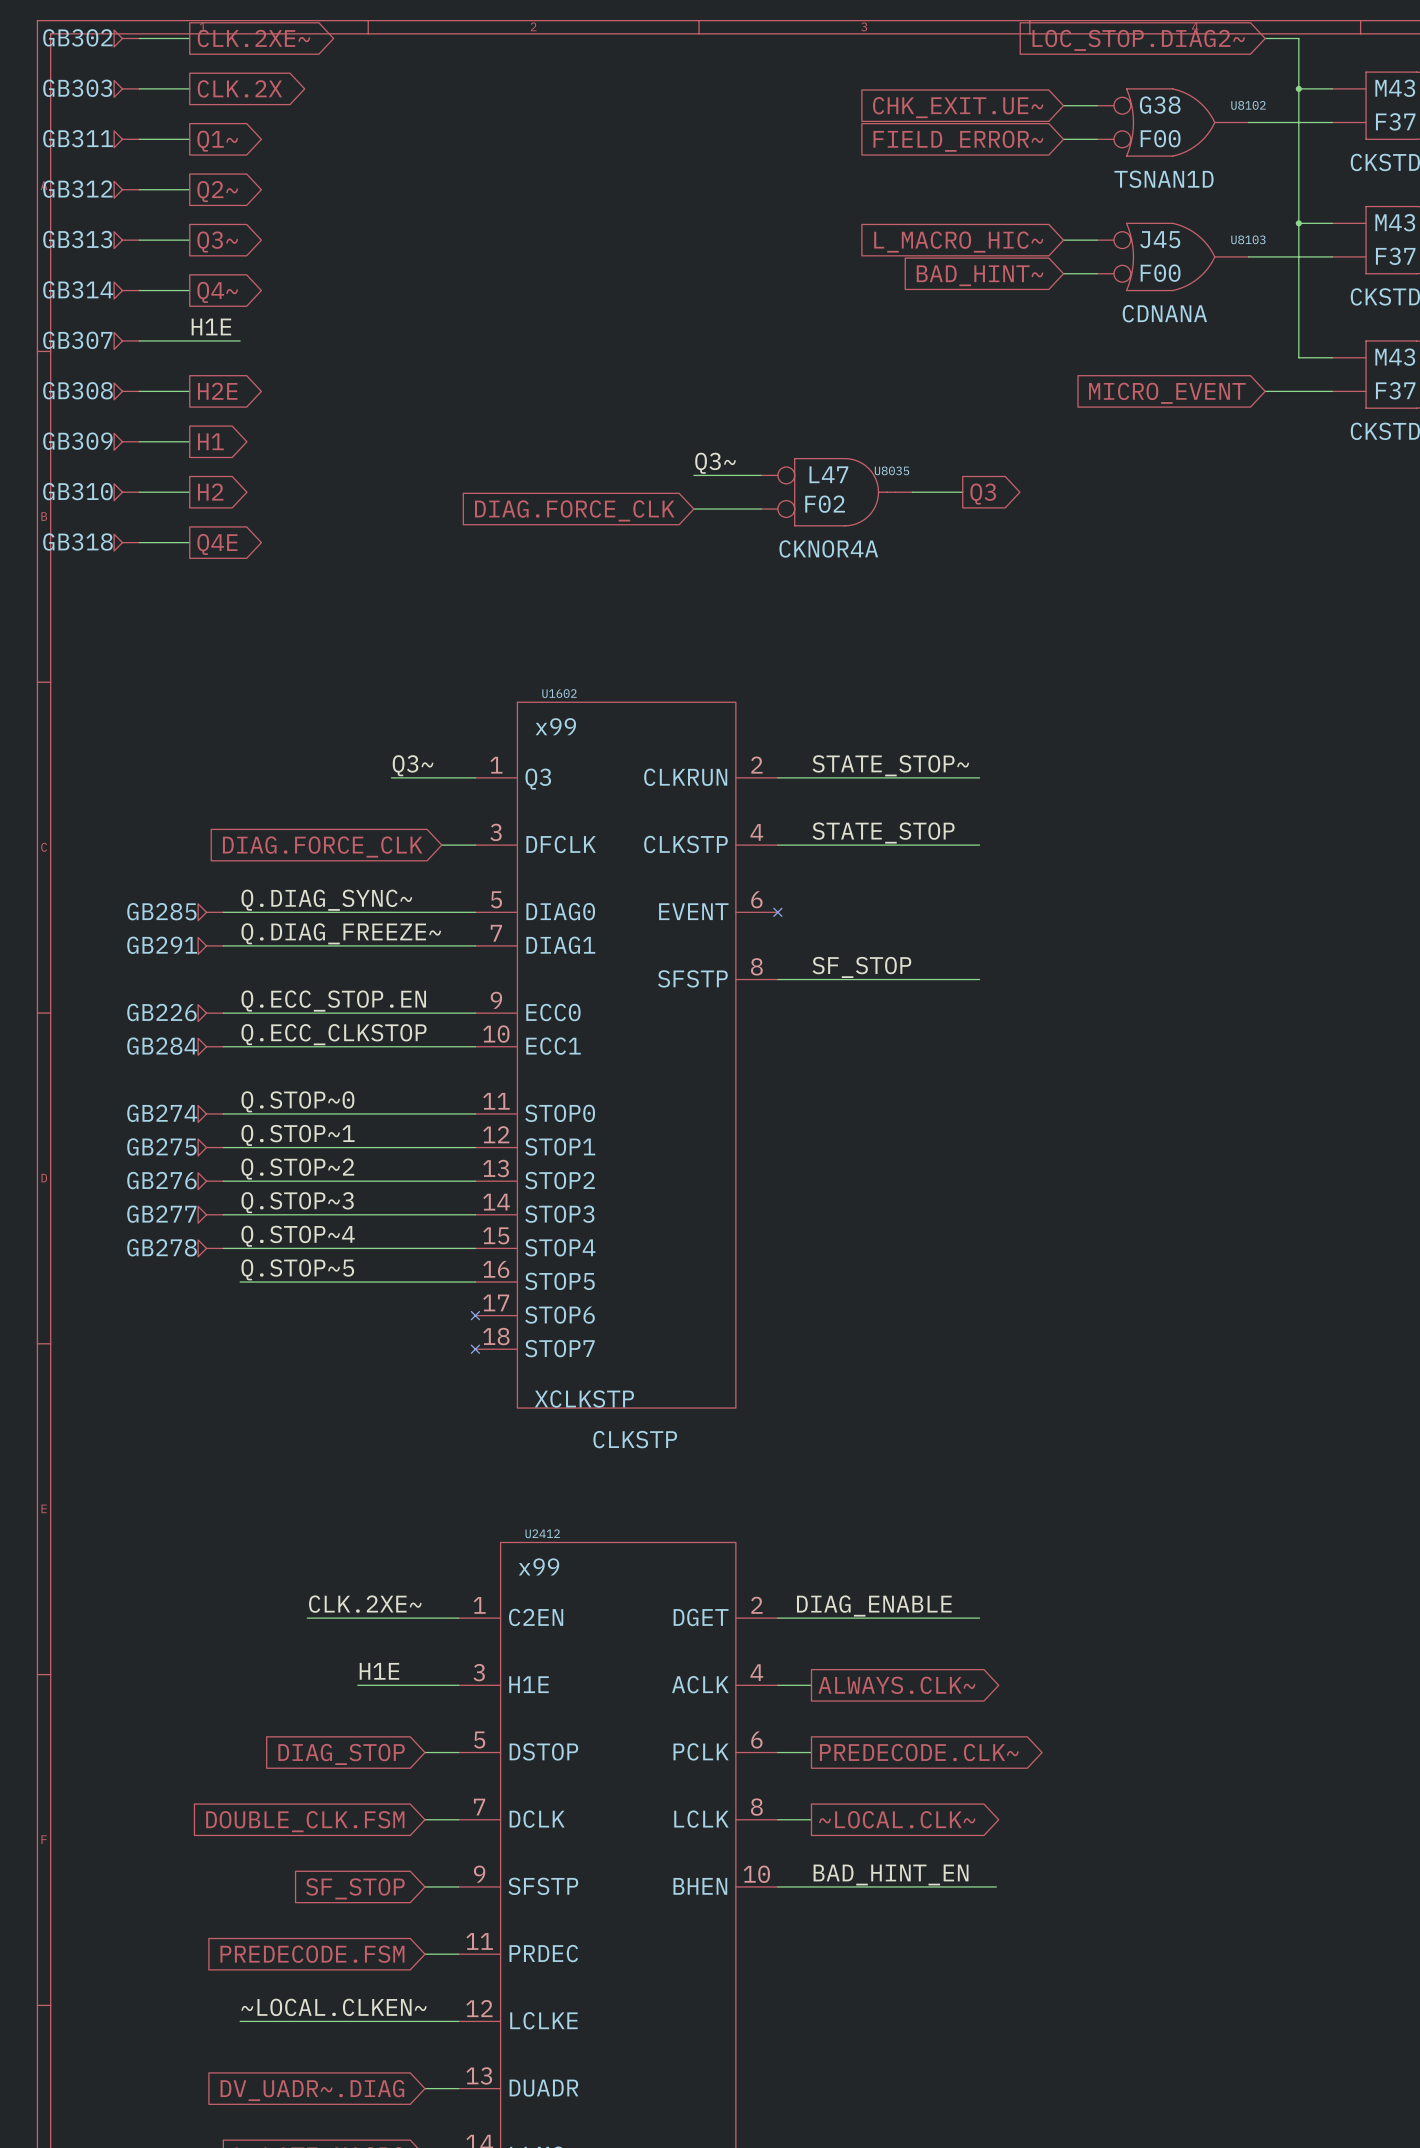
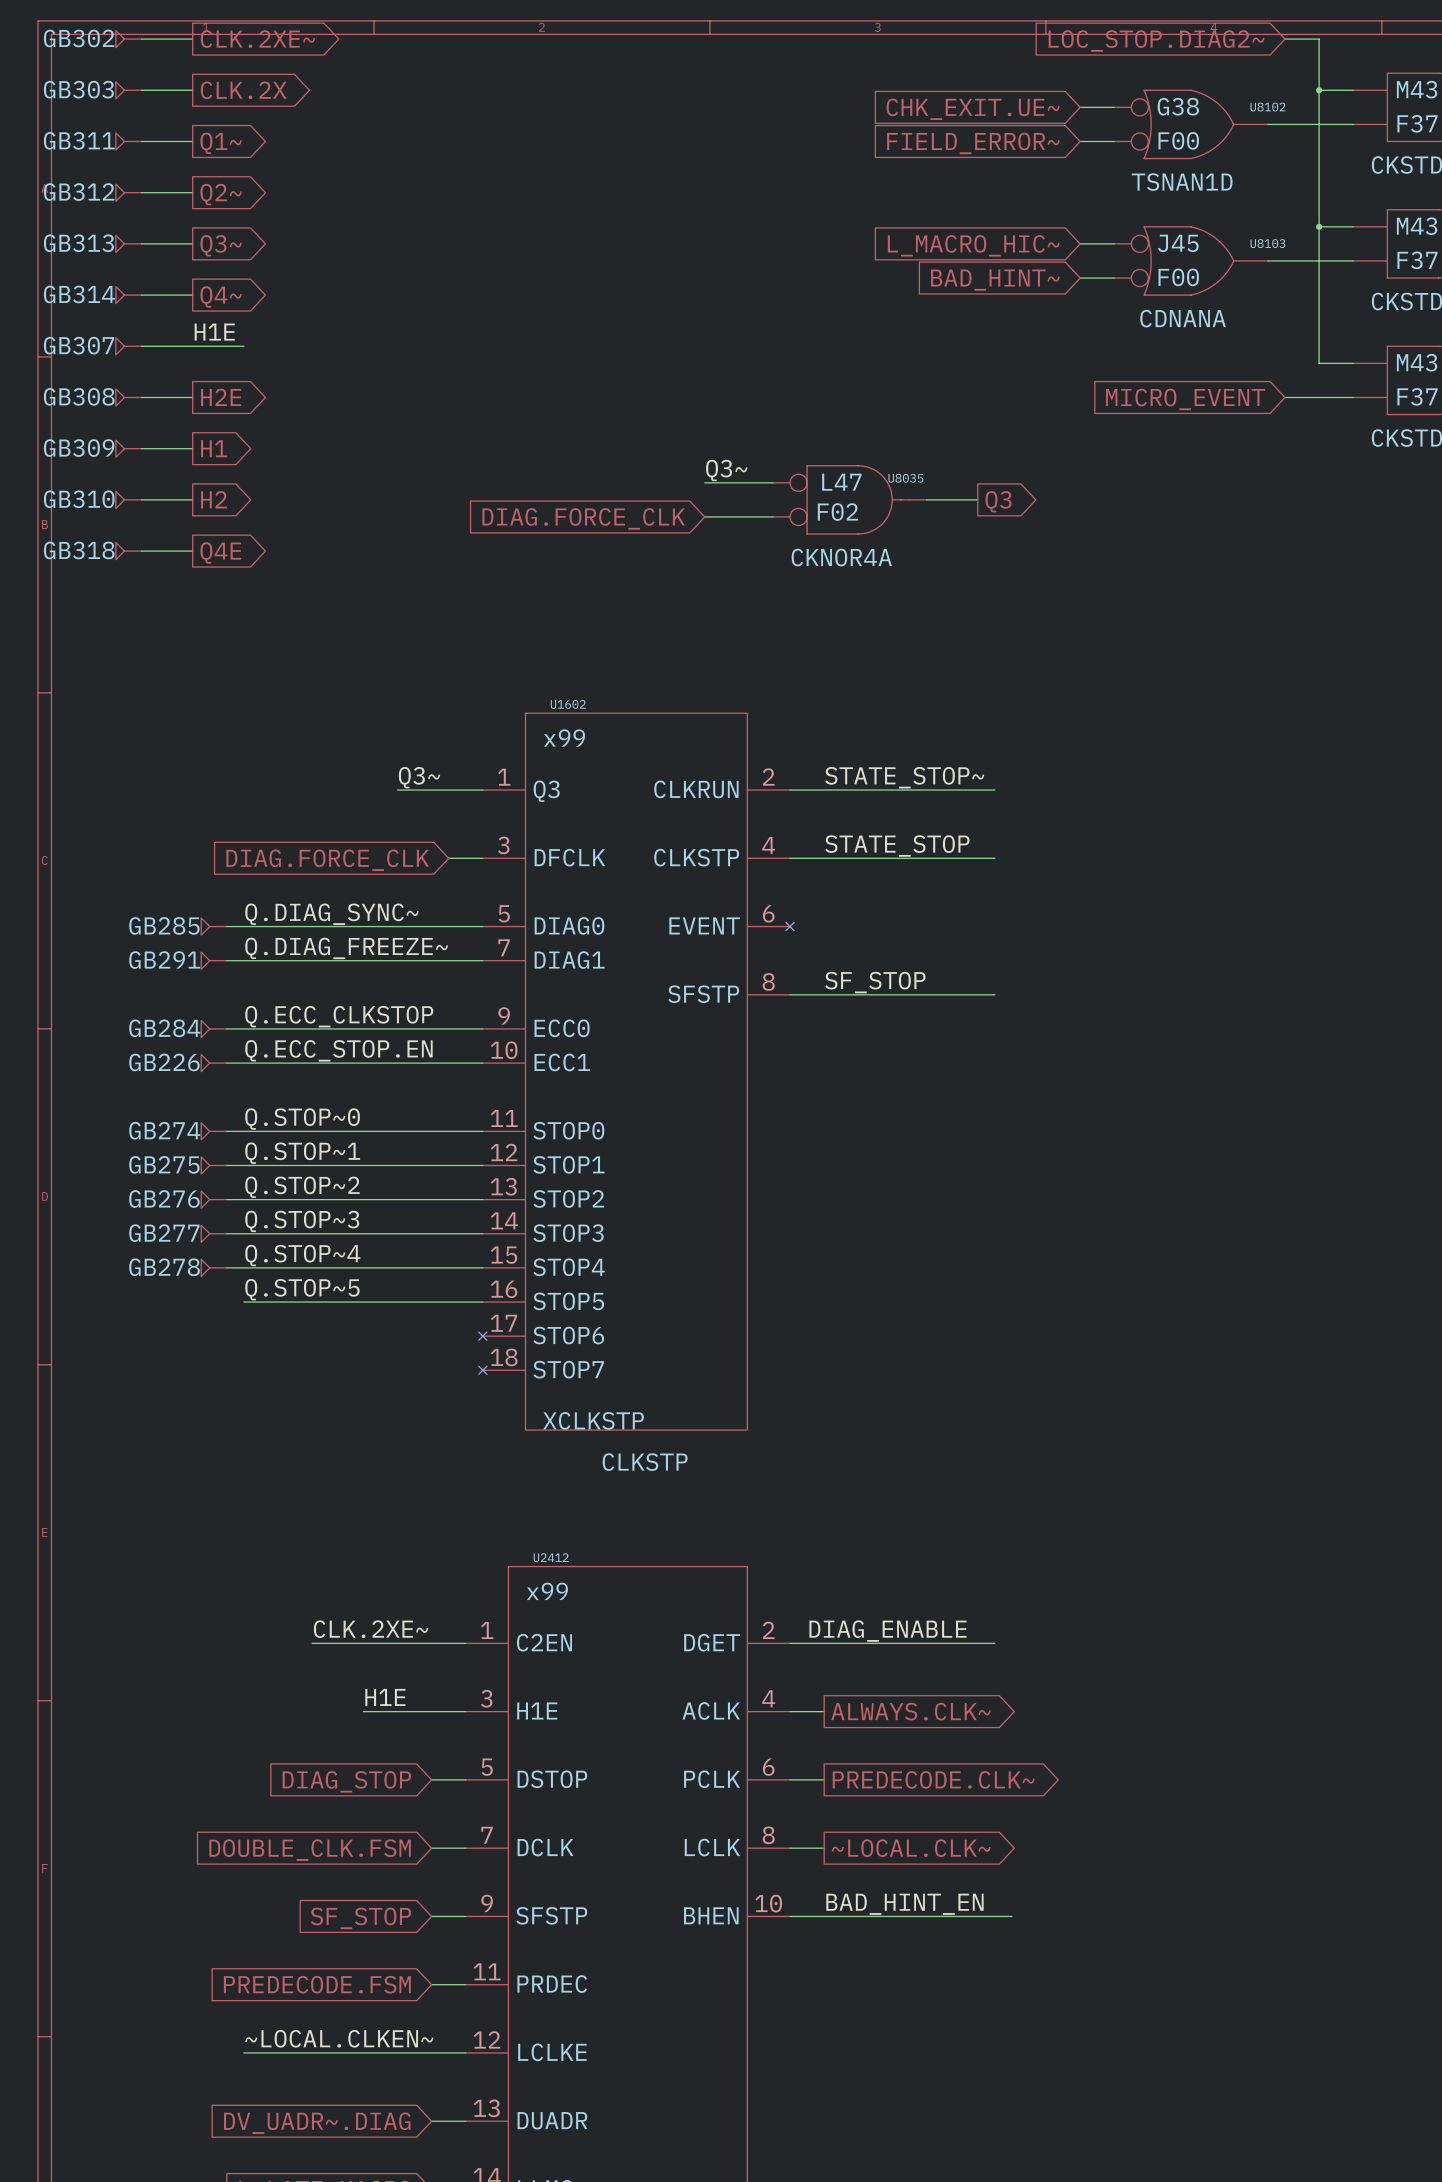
label: Q.ECC_STOP.EN (333, 1001) -> Q.ECC_CLKSTOP (339, 1016)
GB226 name: GB226 (161, 1012) -> GB284 (164, 1028)
label: Q.ECC_CLKSTOP (334, 1034) -> Q.ECC_STOP.EN (338, 1050)
GB284 name: GB284 (162, 1046) -> GB226 (164, 1062)

